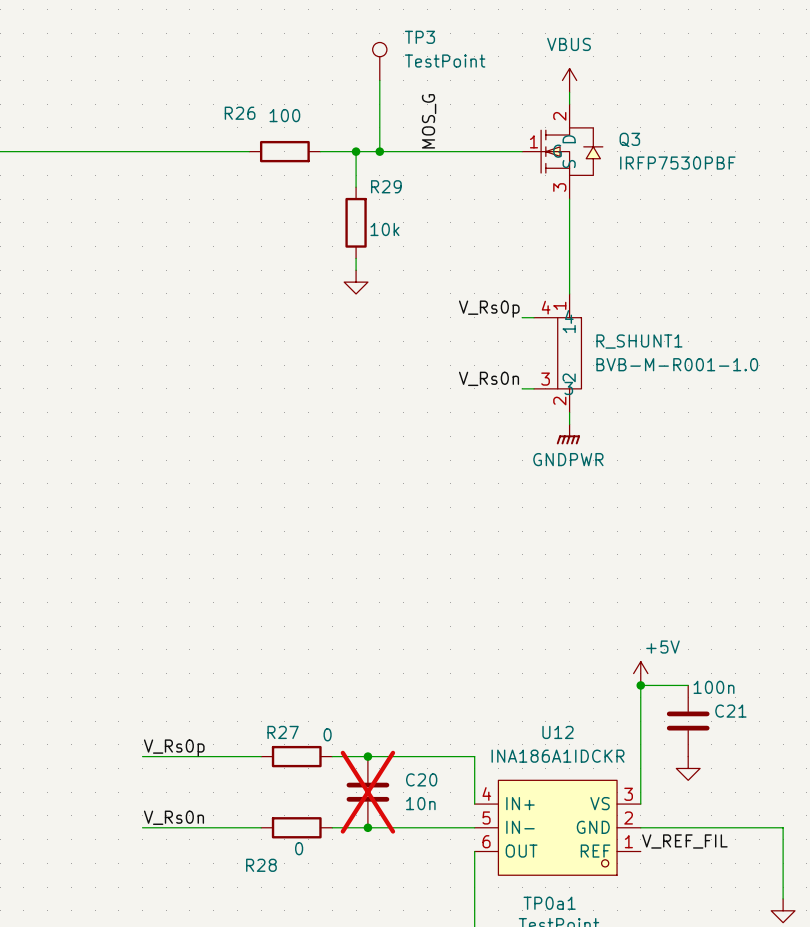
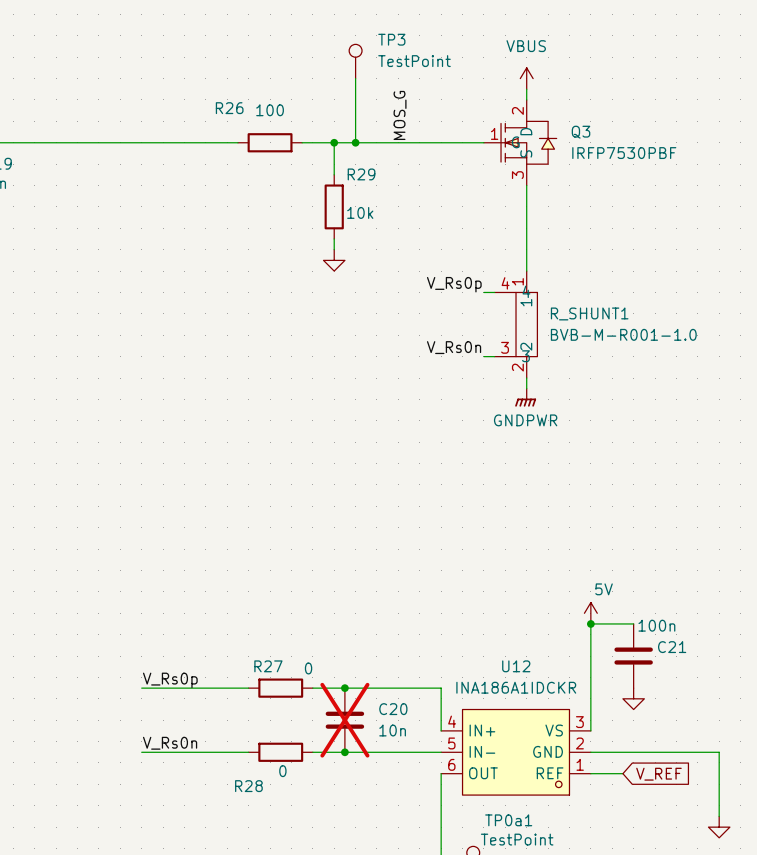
power symbol: +5V (640, 673) -> 5V (590, 613)
label: V_REF_FIL (684, 841) -> none
wire: none -> (590, 773) (622, 773)
global label: none -> V_REF (658, 774)

